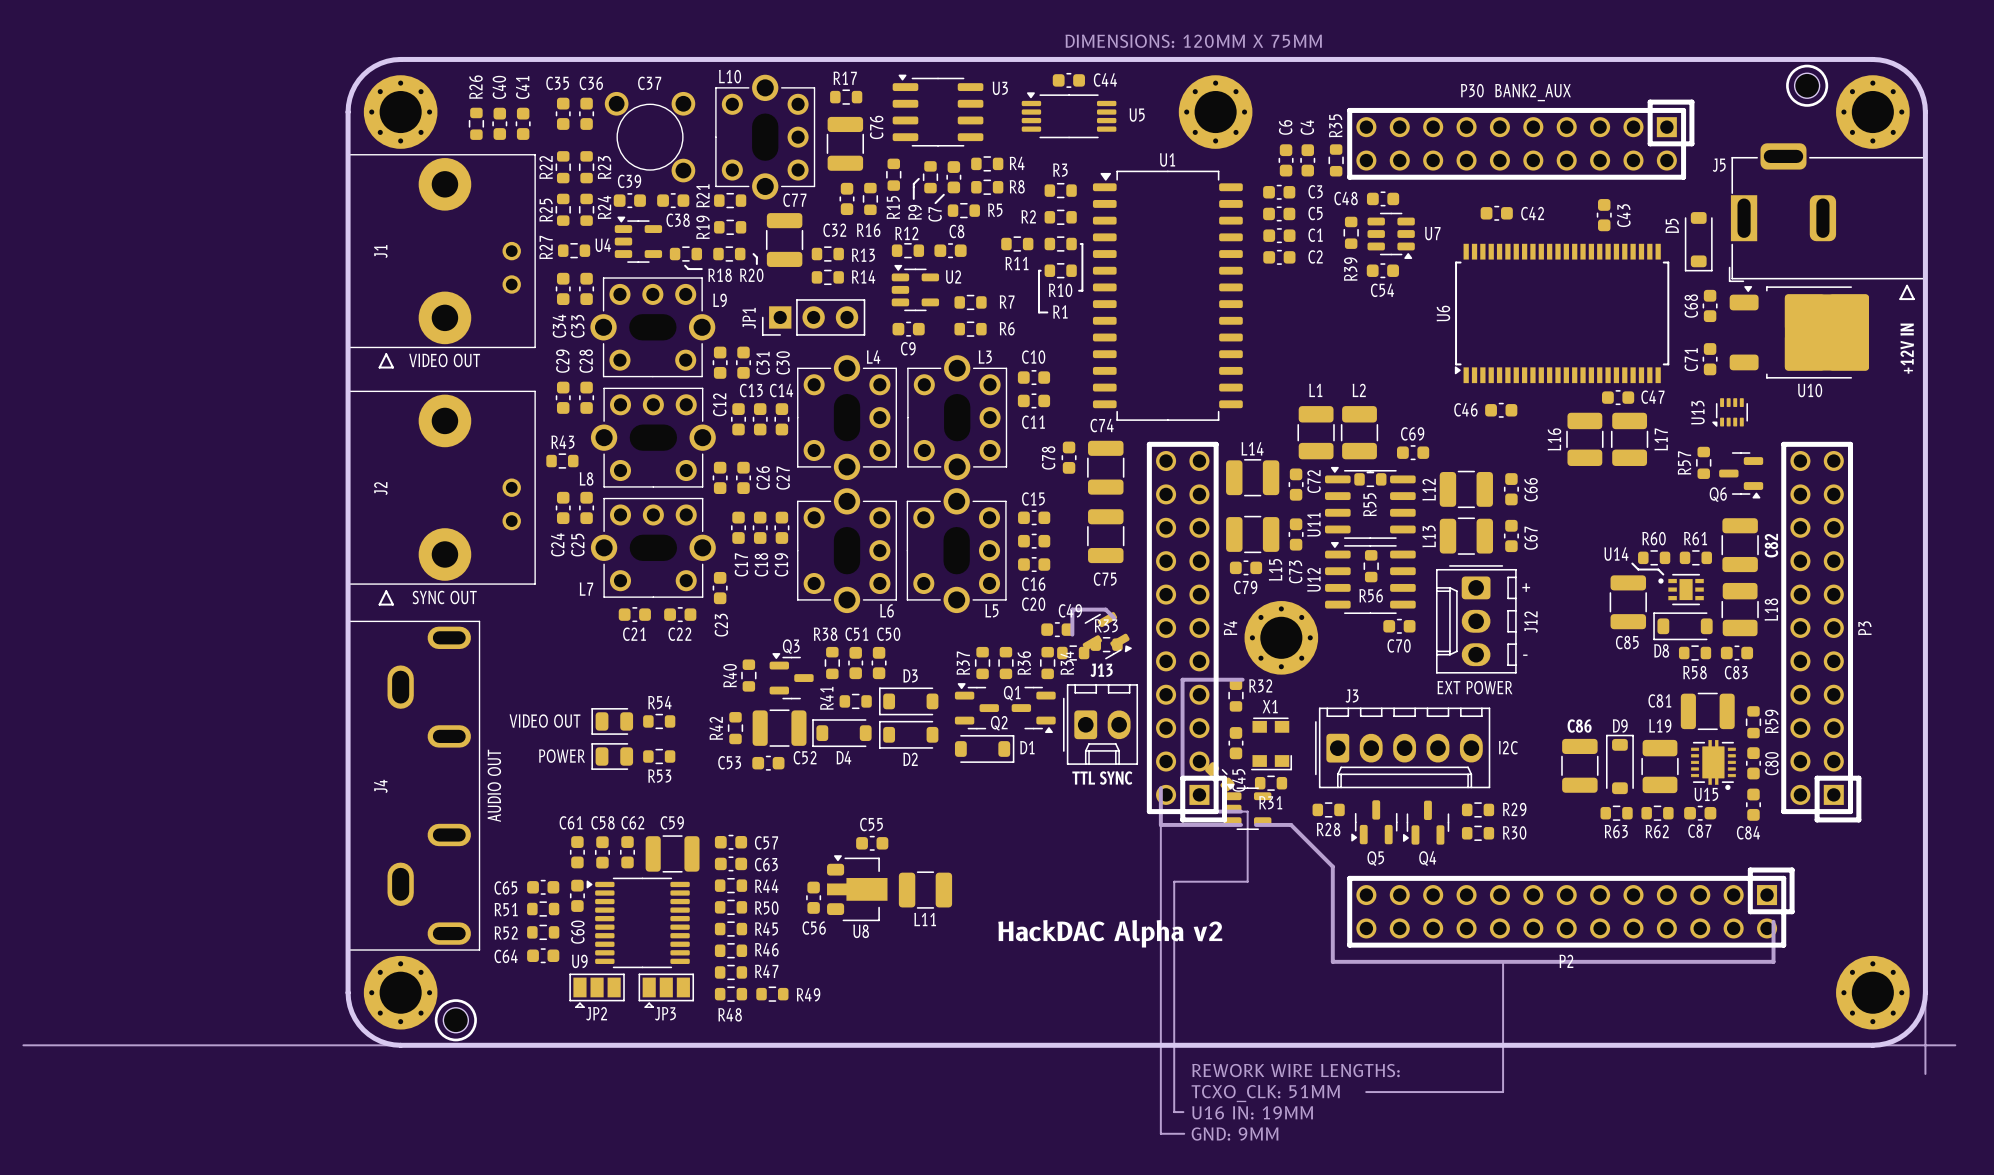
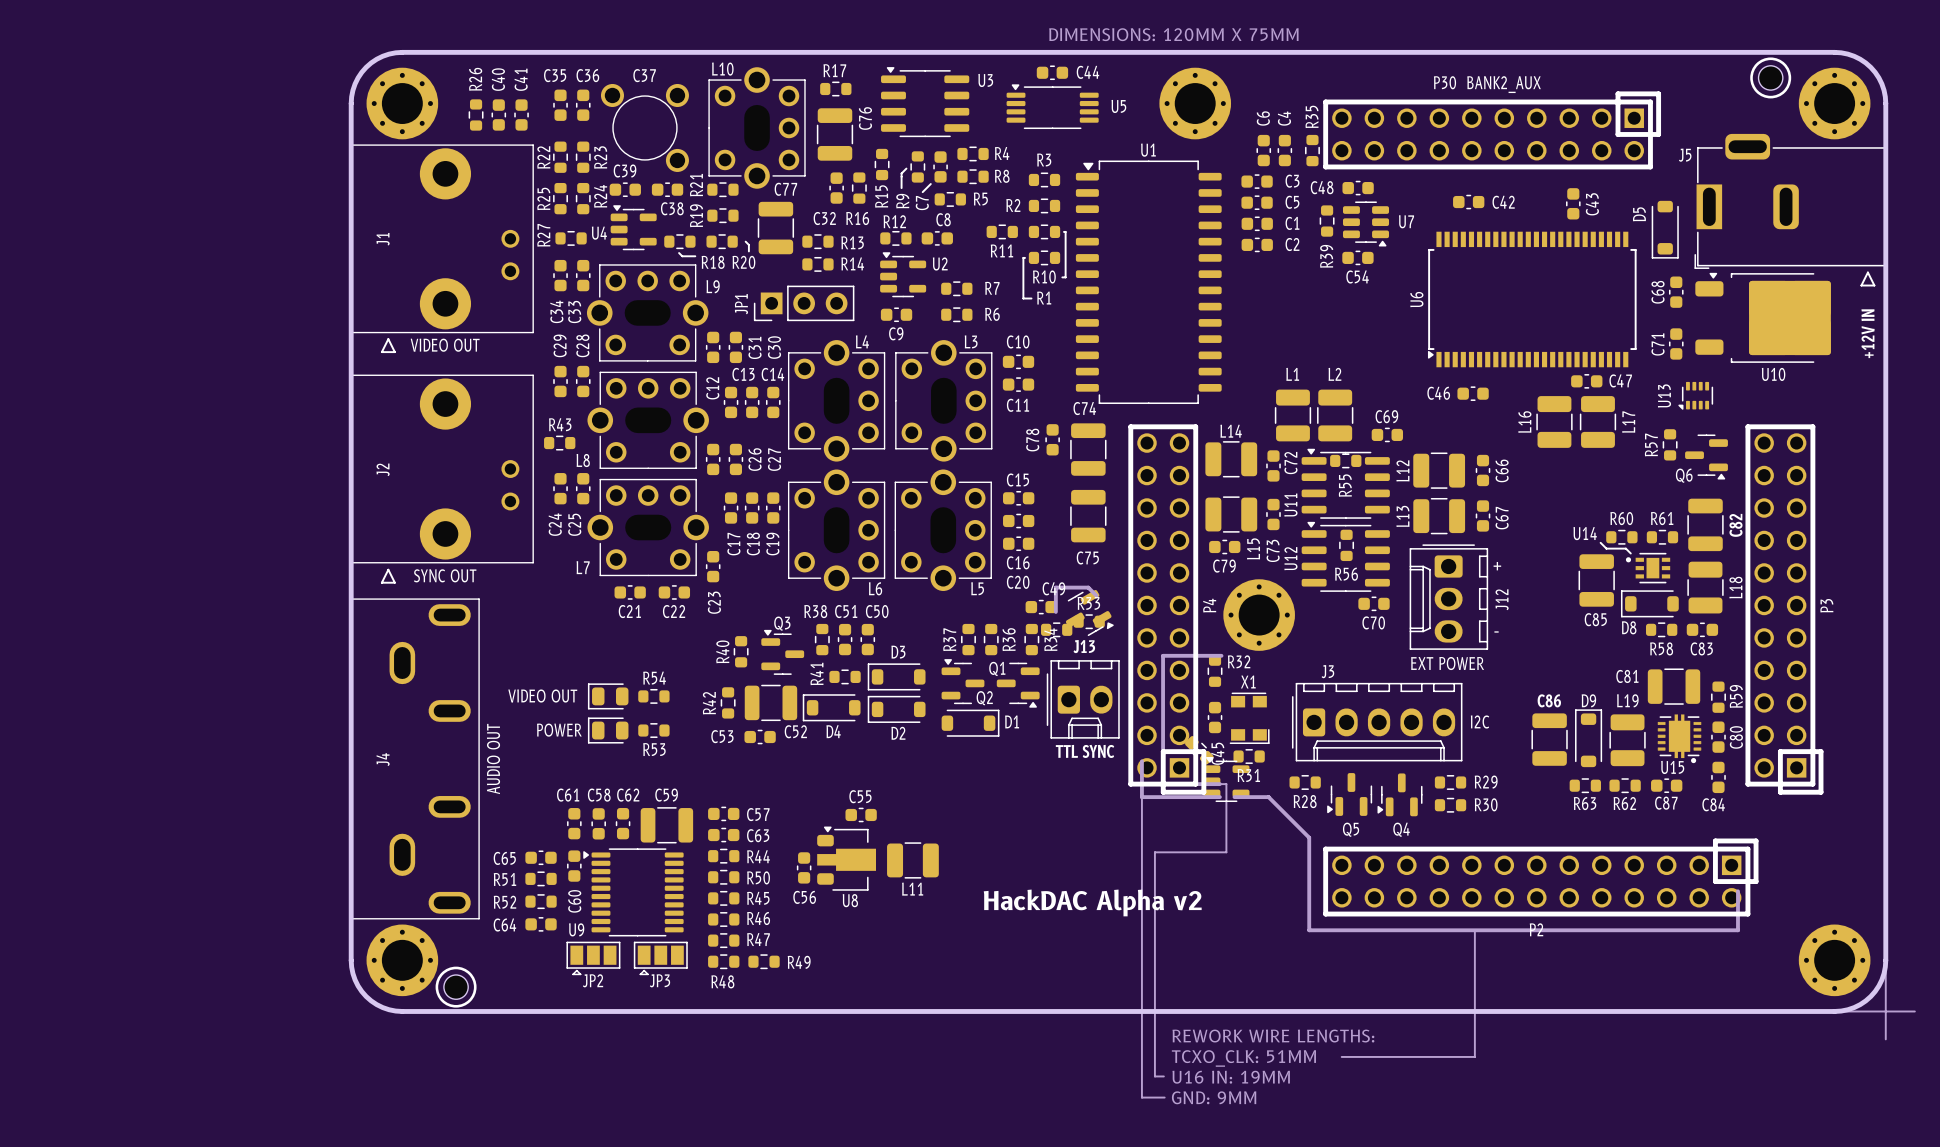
line: (23, 1045) (420, 1045) -> none

